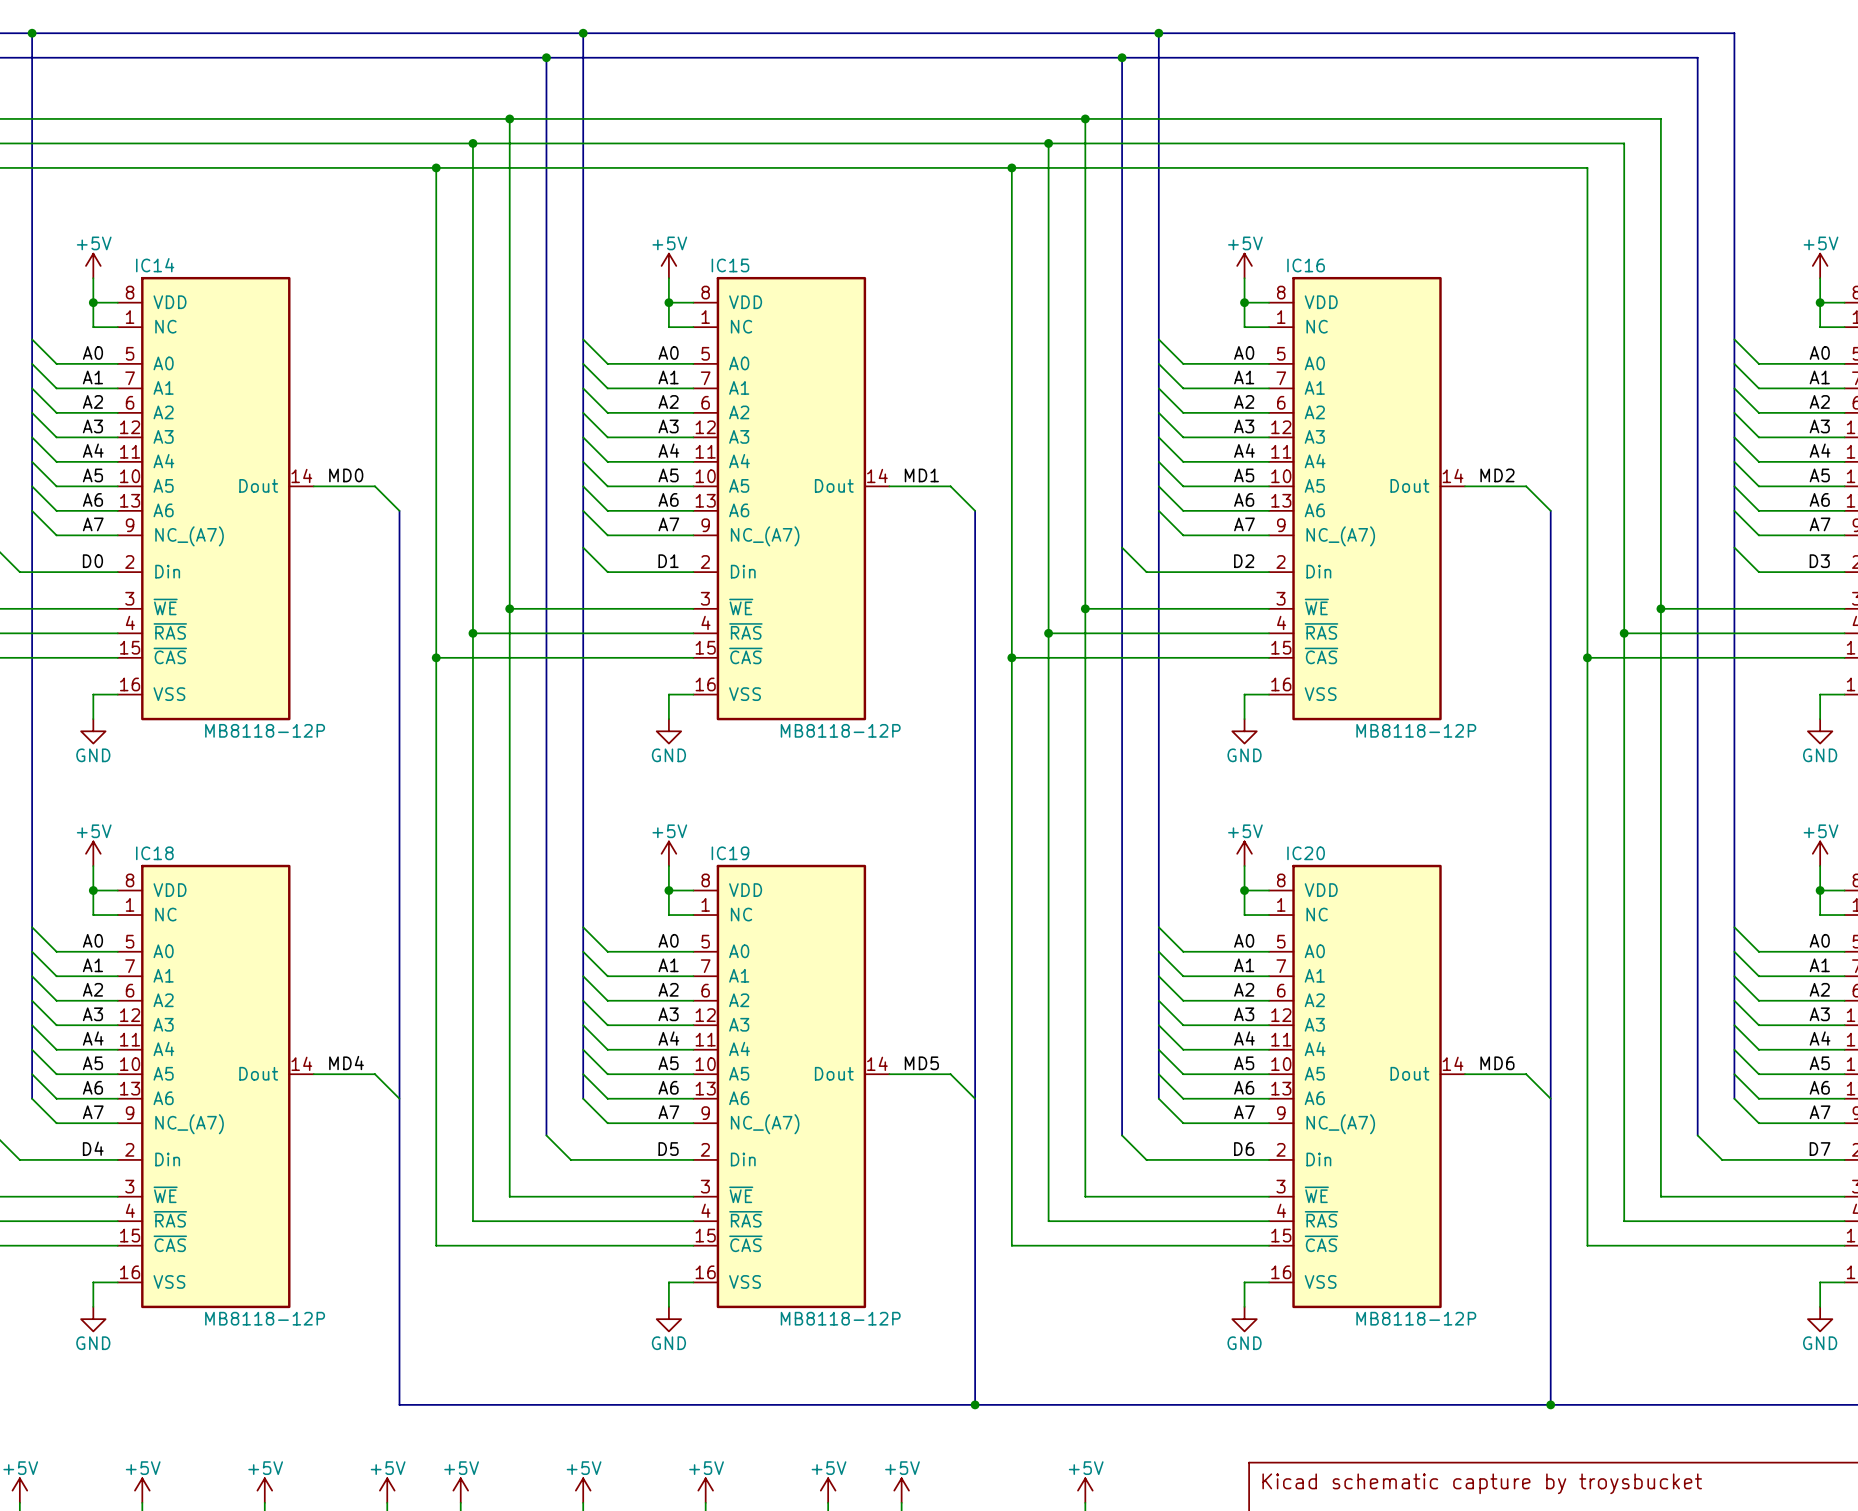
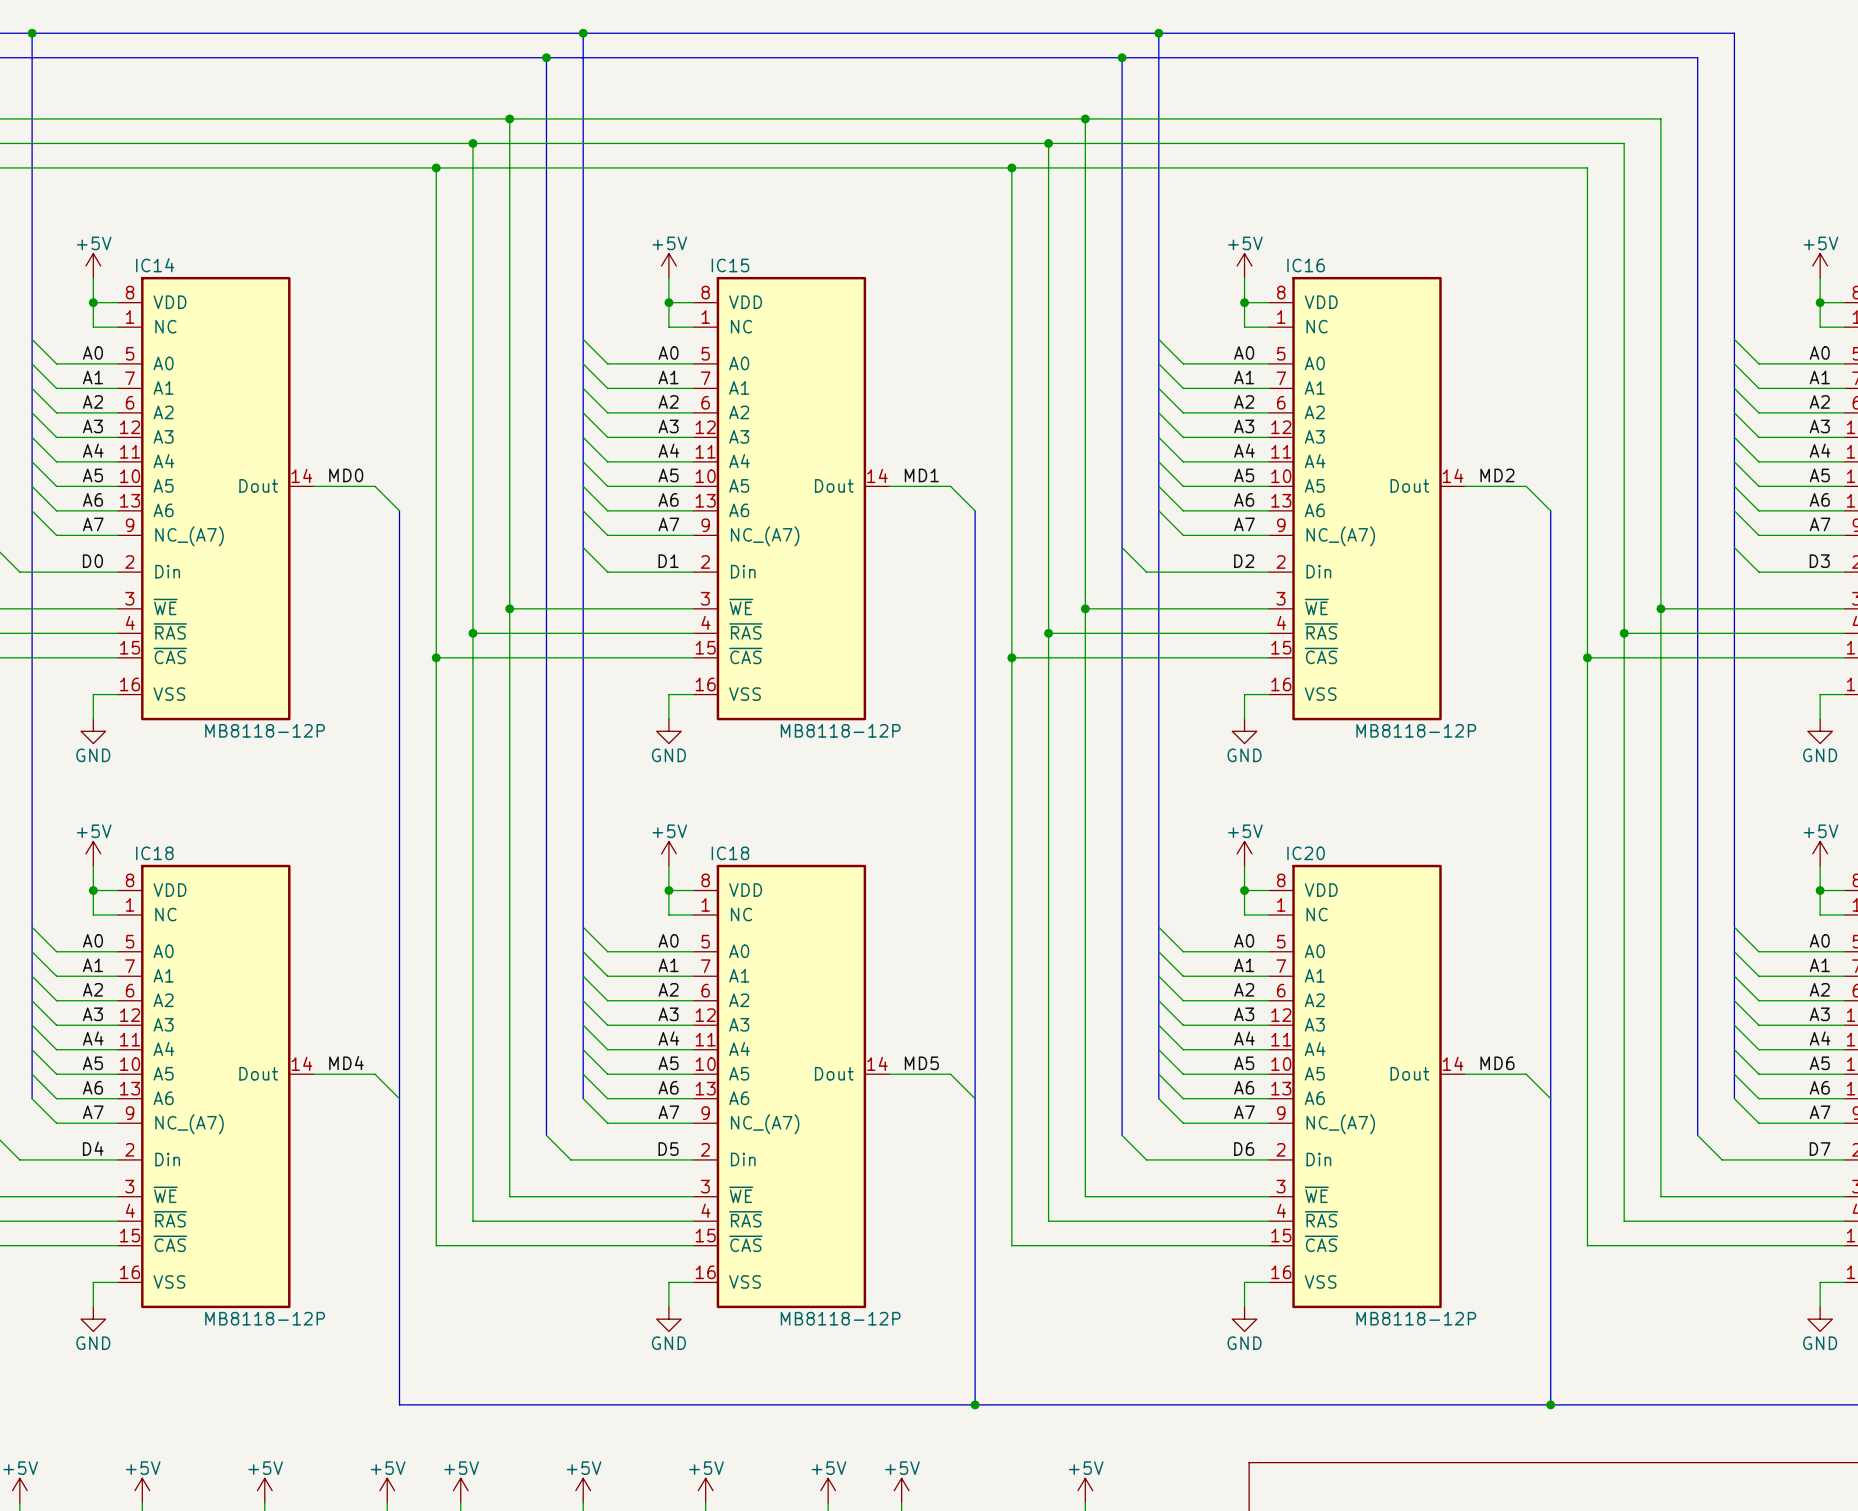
IC19 name: IC19 (730, 853) -> IC18 (730, 853)
title block: Kicad schematic capture by troysbucket (1482, 1483) -> none

